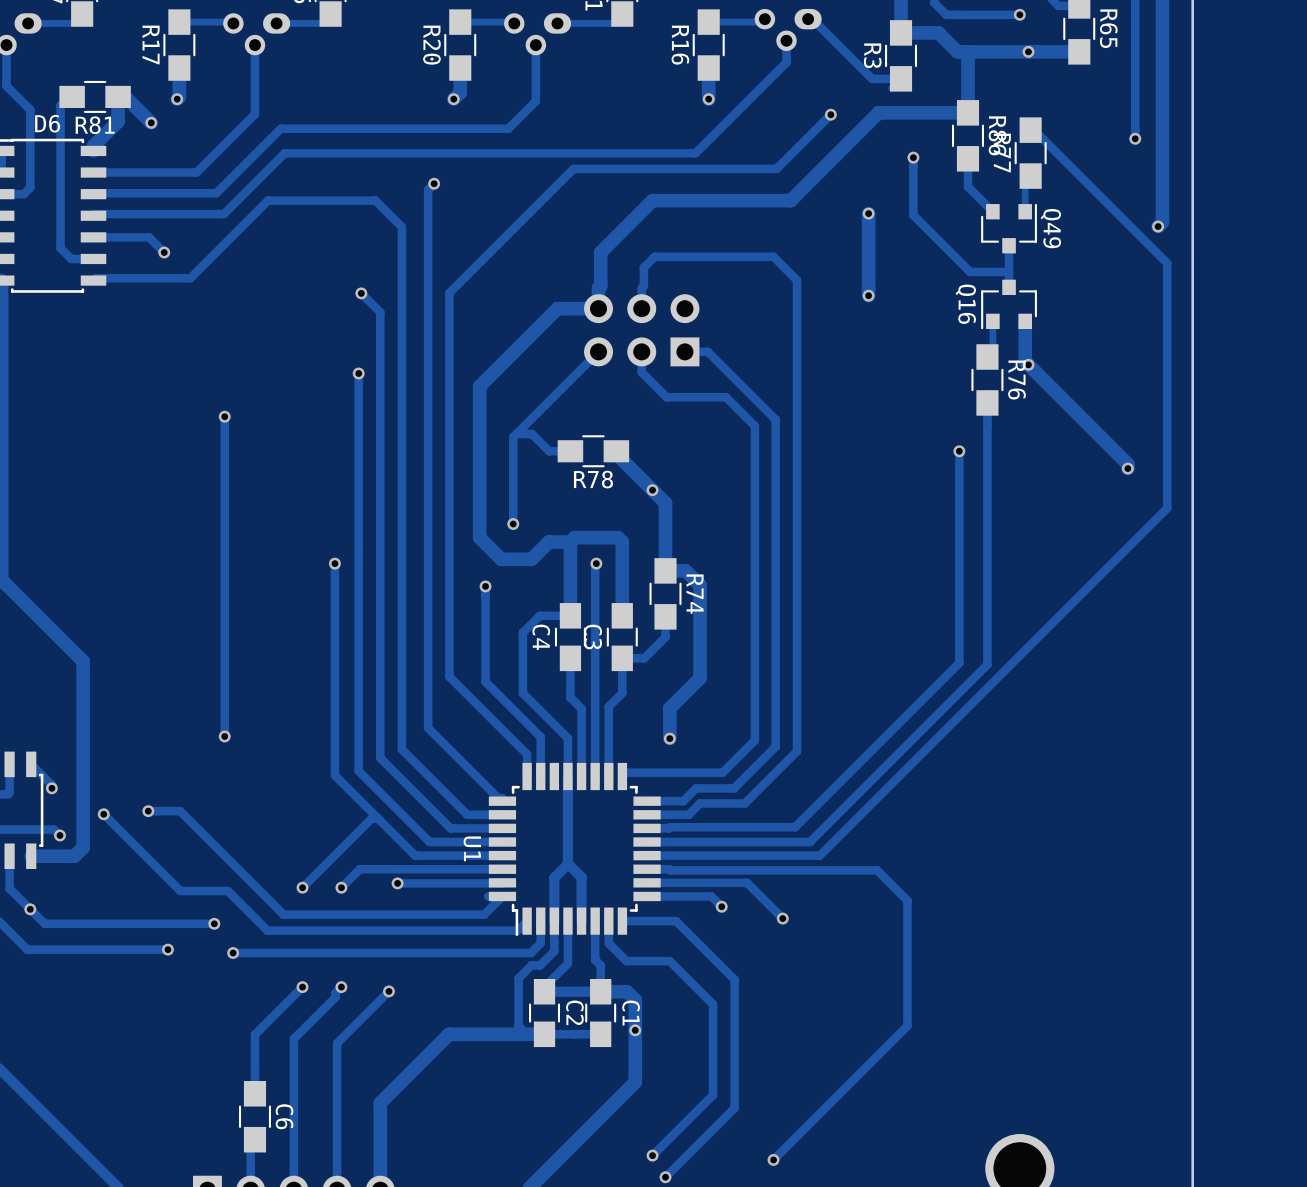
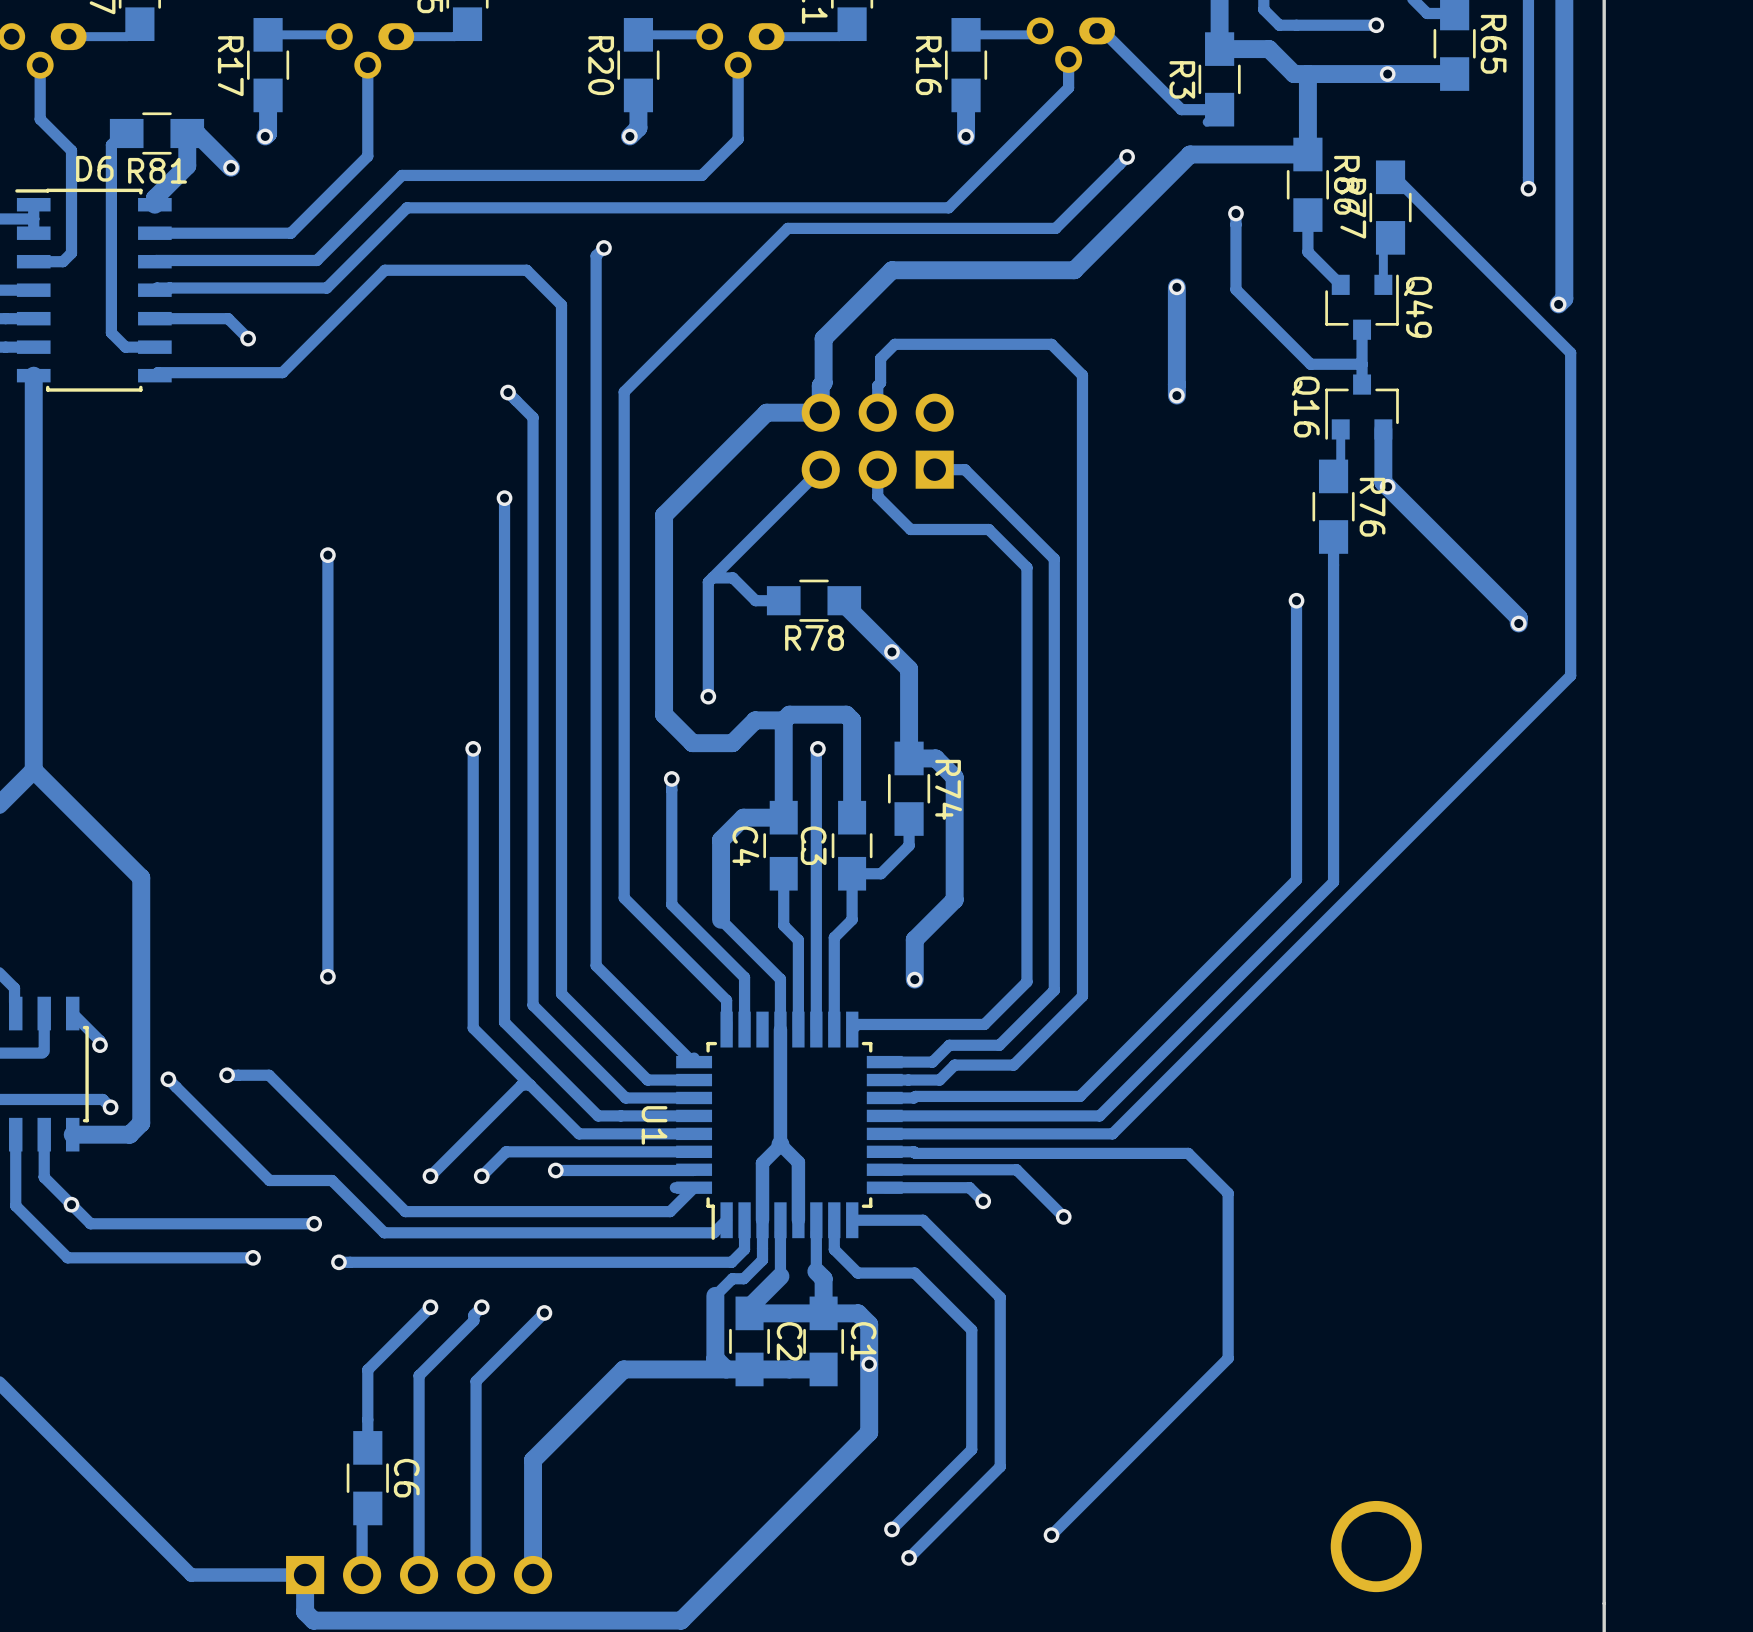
track width: thin (570, 615) (539, 615) (522, 632) (522, 693) -> thick (783, 817) (743, 817) (721, 840) (721, 919)
track width: thin (595, 959) (600, 965) (600, 991) (544, 991) (544, 987) (567, 963) -> thick (816, 1271) (823, 1278) (823, 1313) (749, 1313) (749, 1307) (780, 1276)
track width: thin (518, 978) (518, 1025) (526, 1034) -> thick (715, 1295) (715, 1358) (726, 1369)
track width: thin (600, 1034) (544, 1034) -> thick (823, 1369) (749, 1369)

